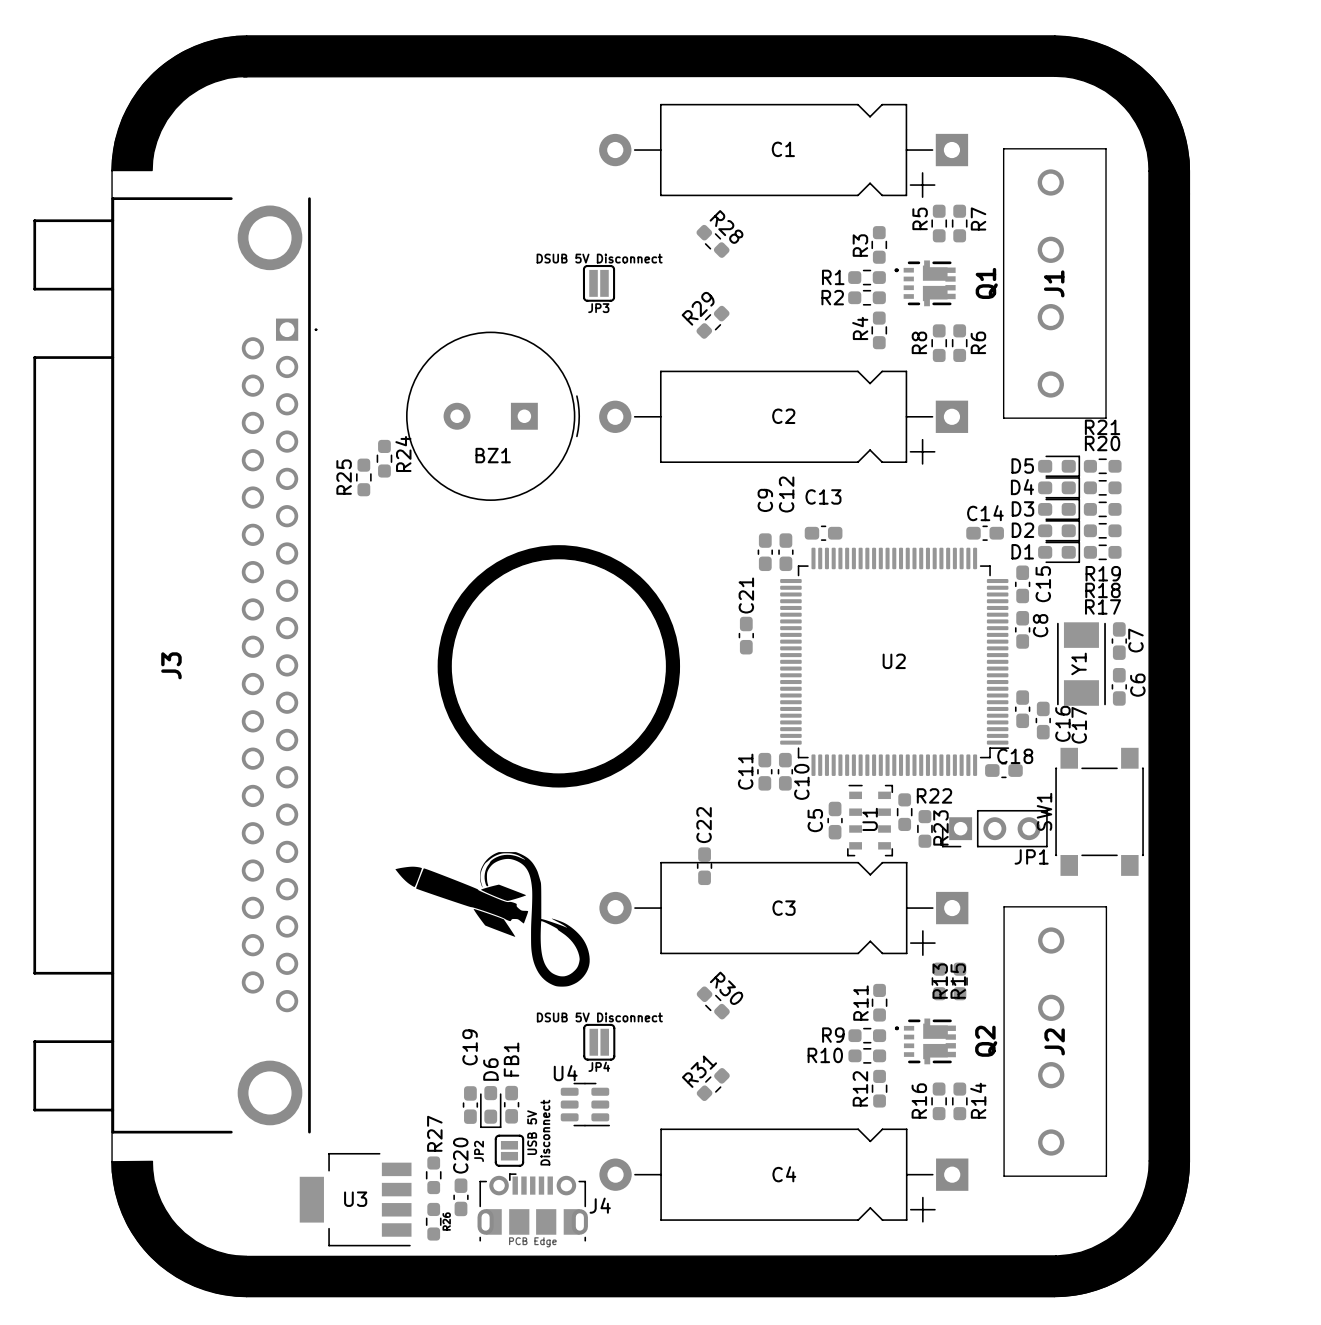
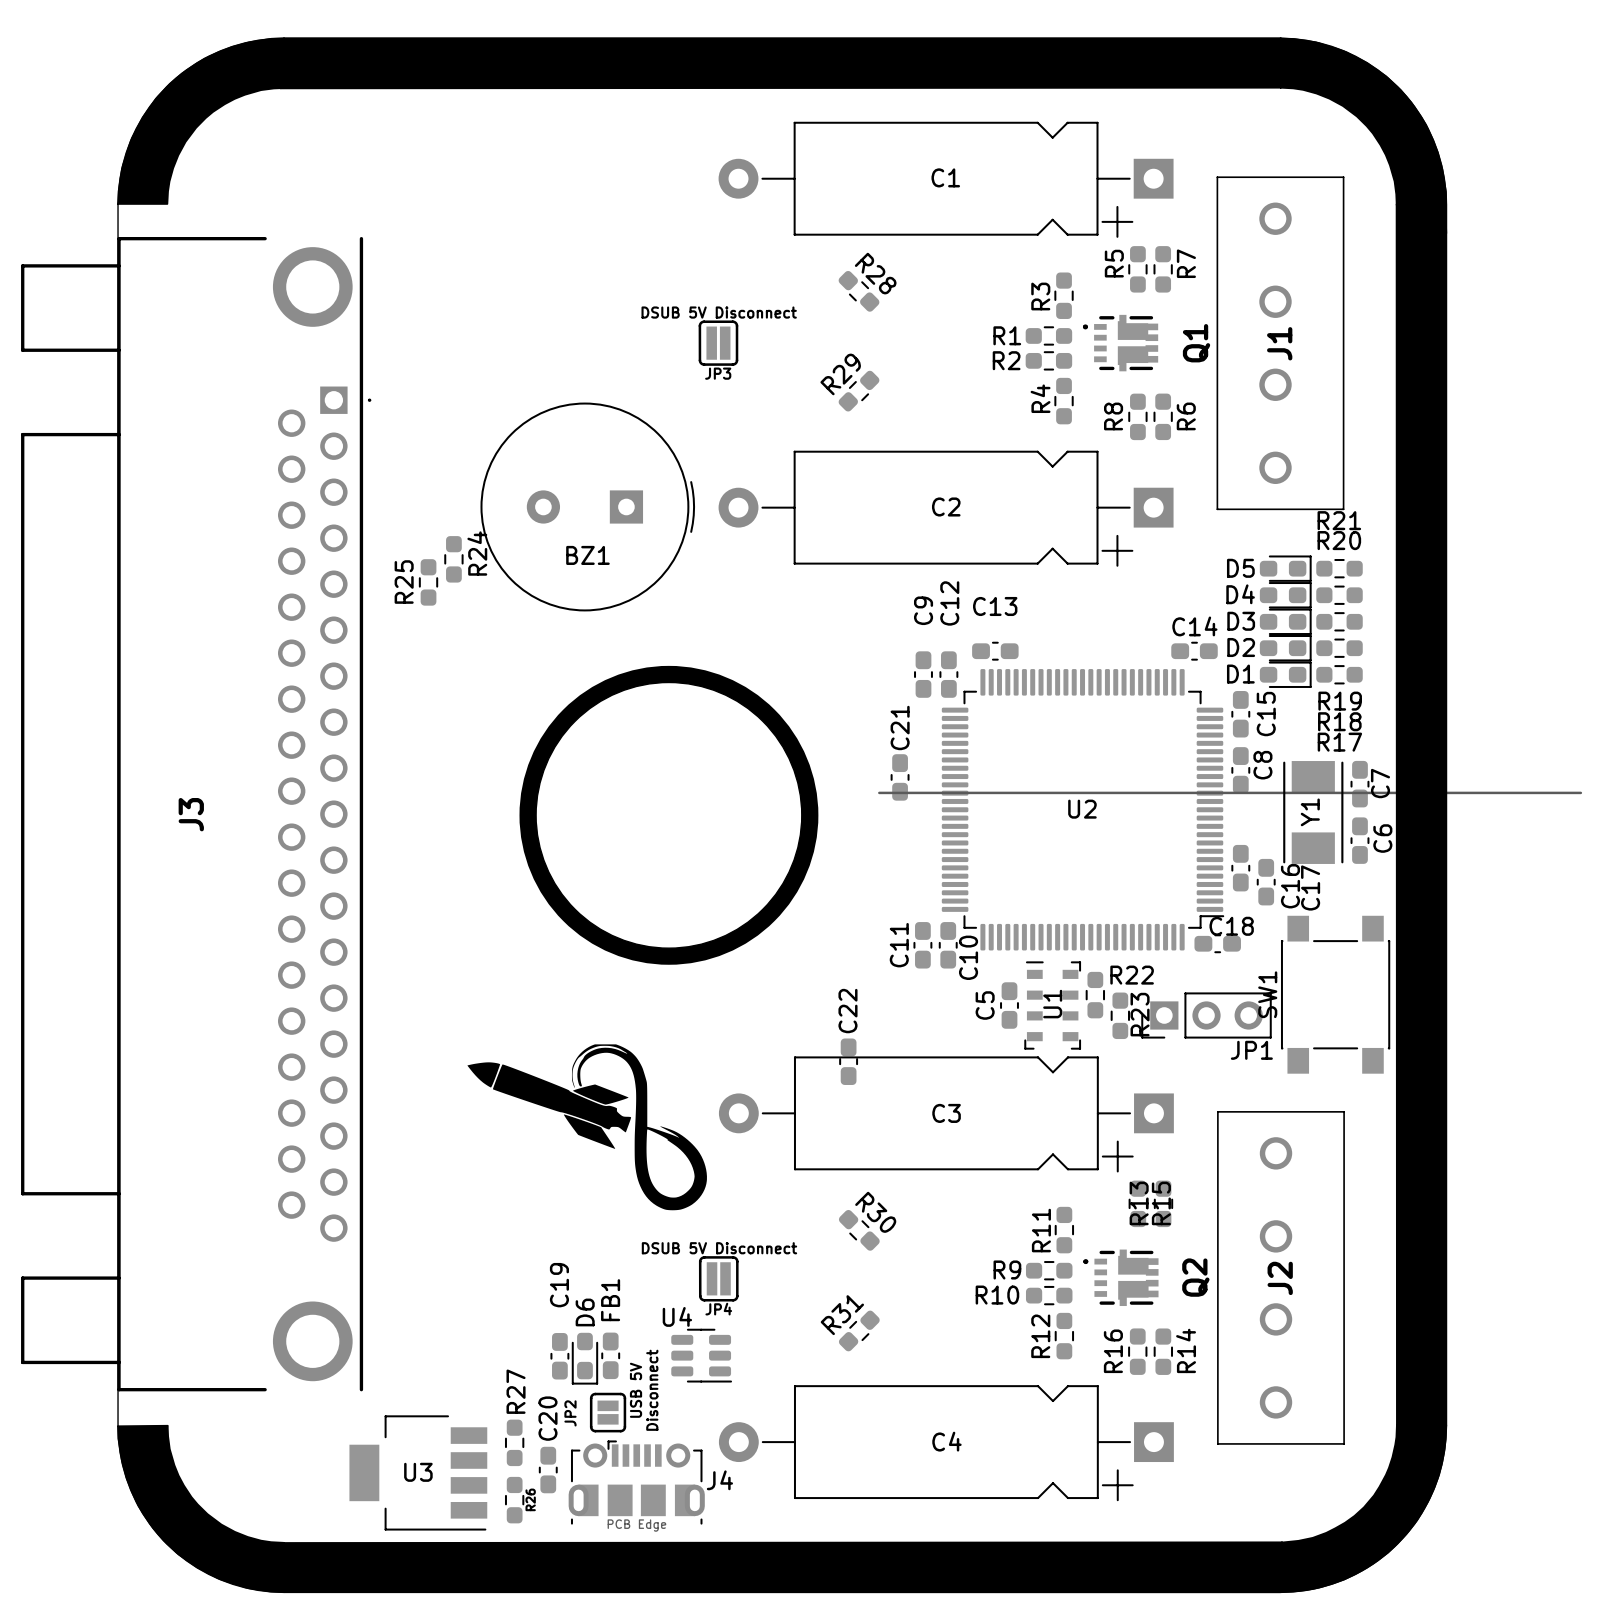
line: none -> (879, 792) (1580, 792)

